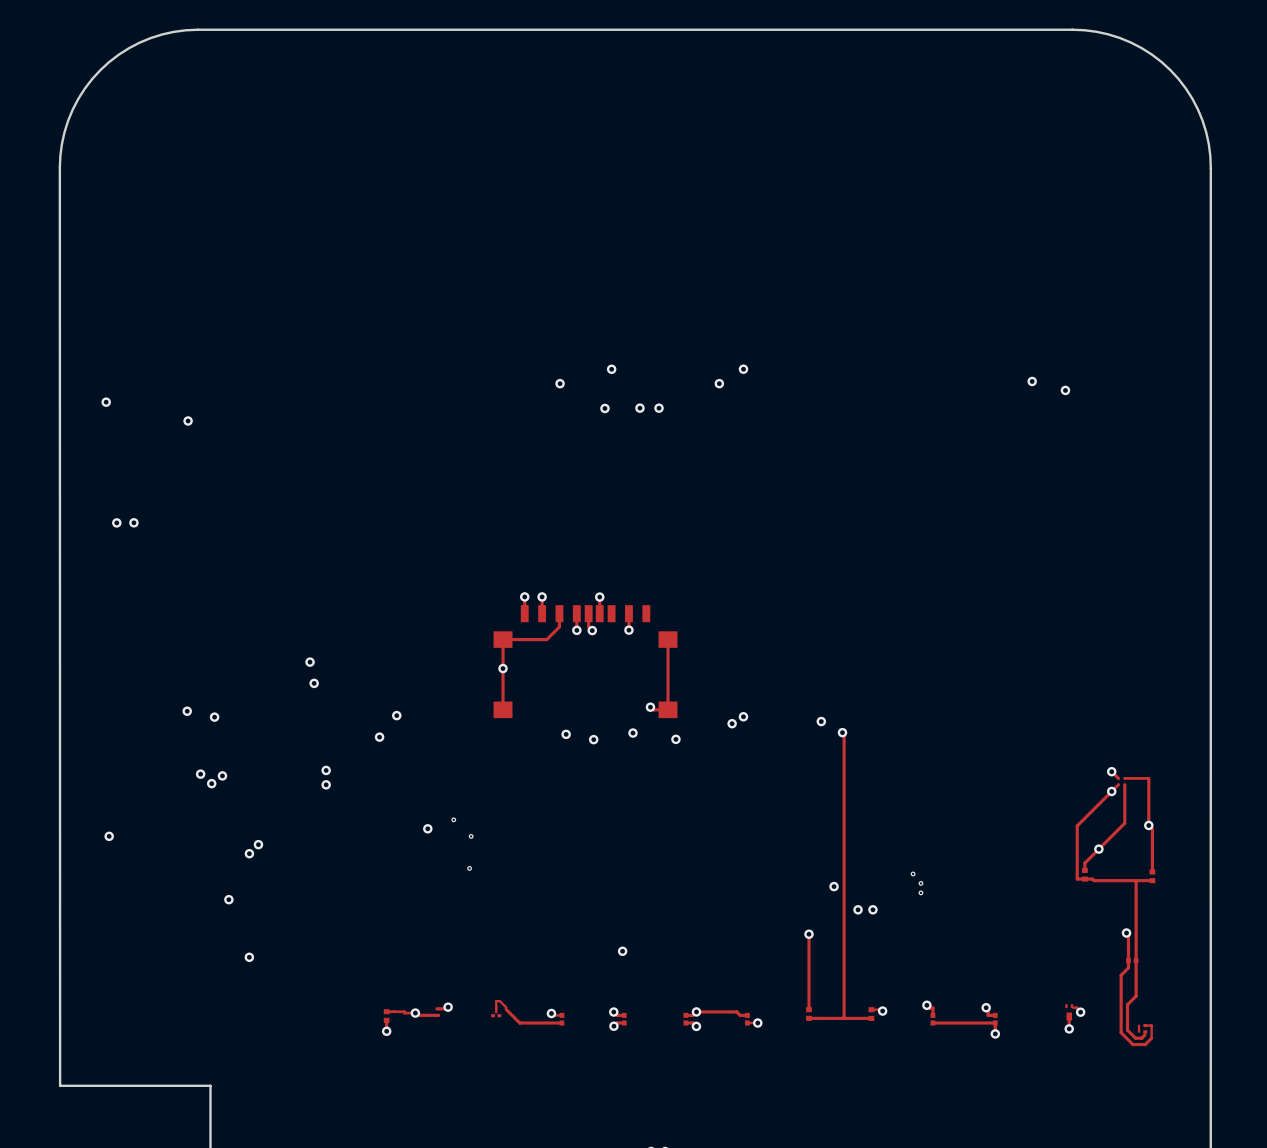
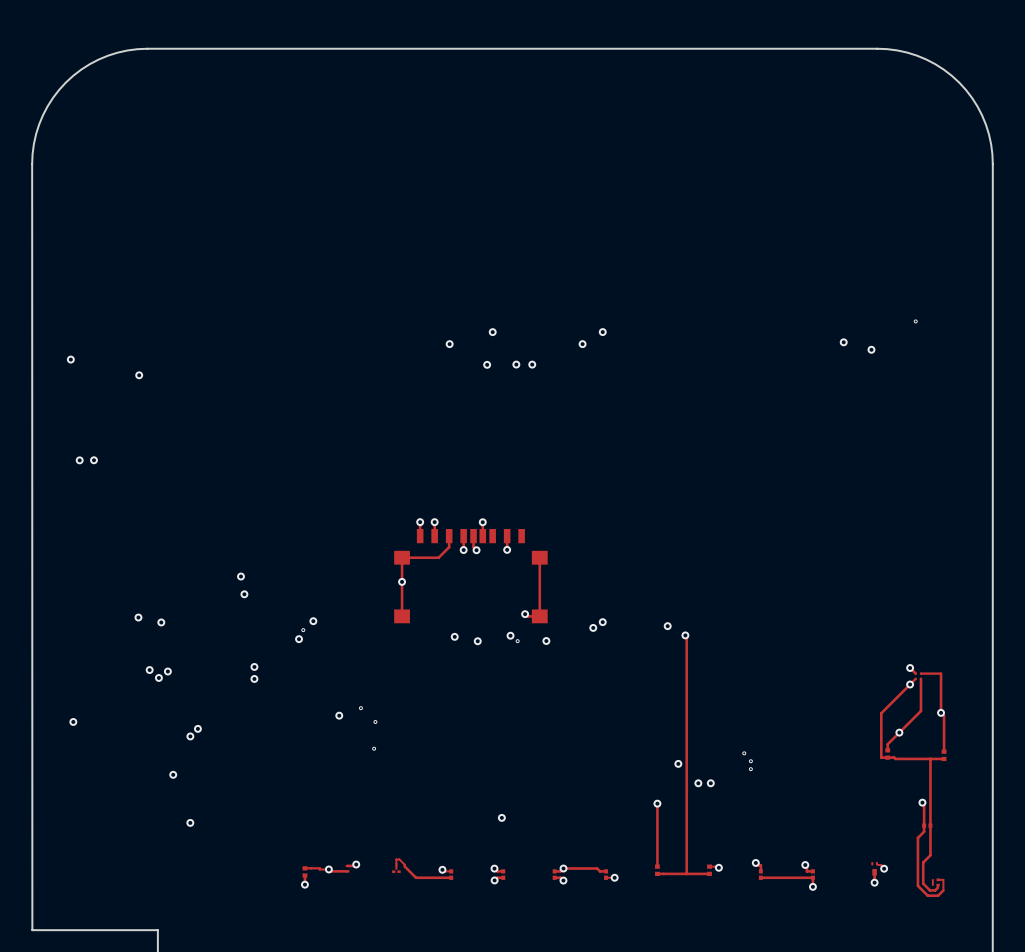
via: none -> (915, 321)
via: none -> (303, 630)
via: none -> (517, 641)

